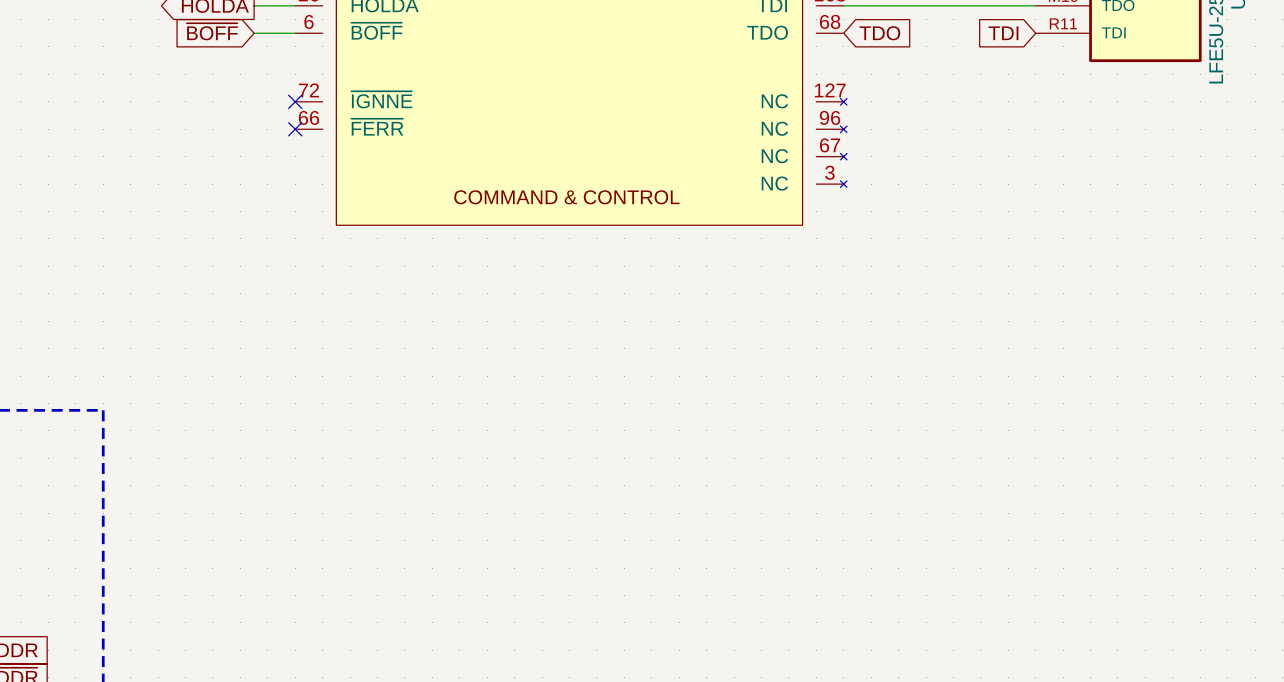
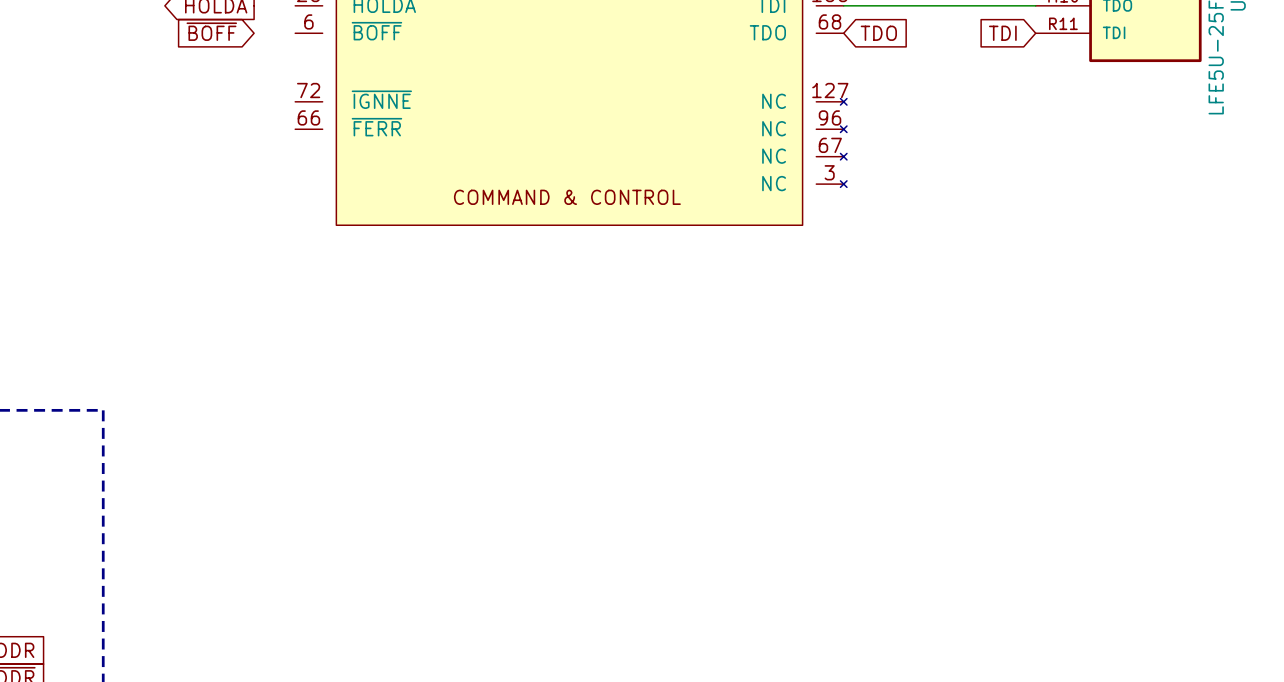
wire: (254, 5) (295, 5) -> none
wire: (254, 33) (295, 33) -> none
no-connect mark: (295, 101) -> none
no-connect mark: (295, 129) -> none

